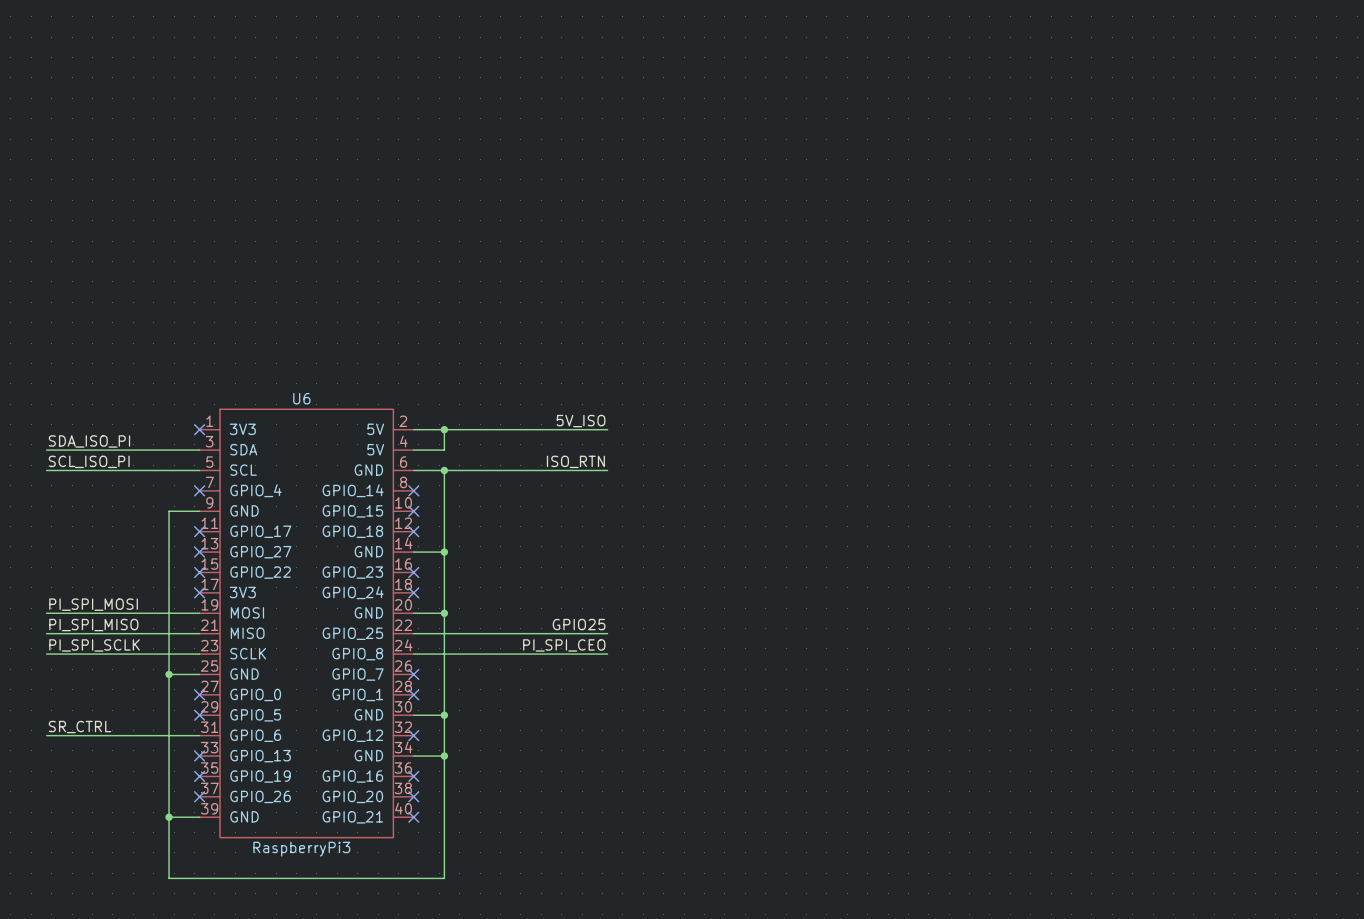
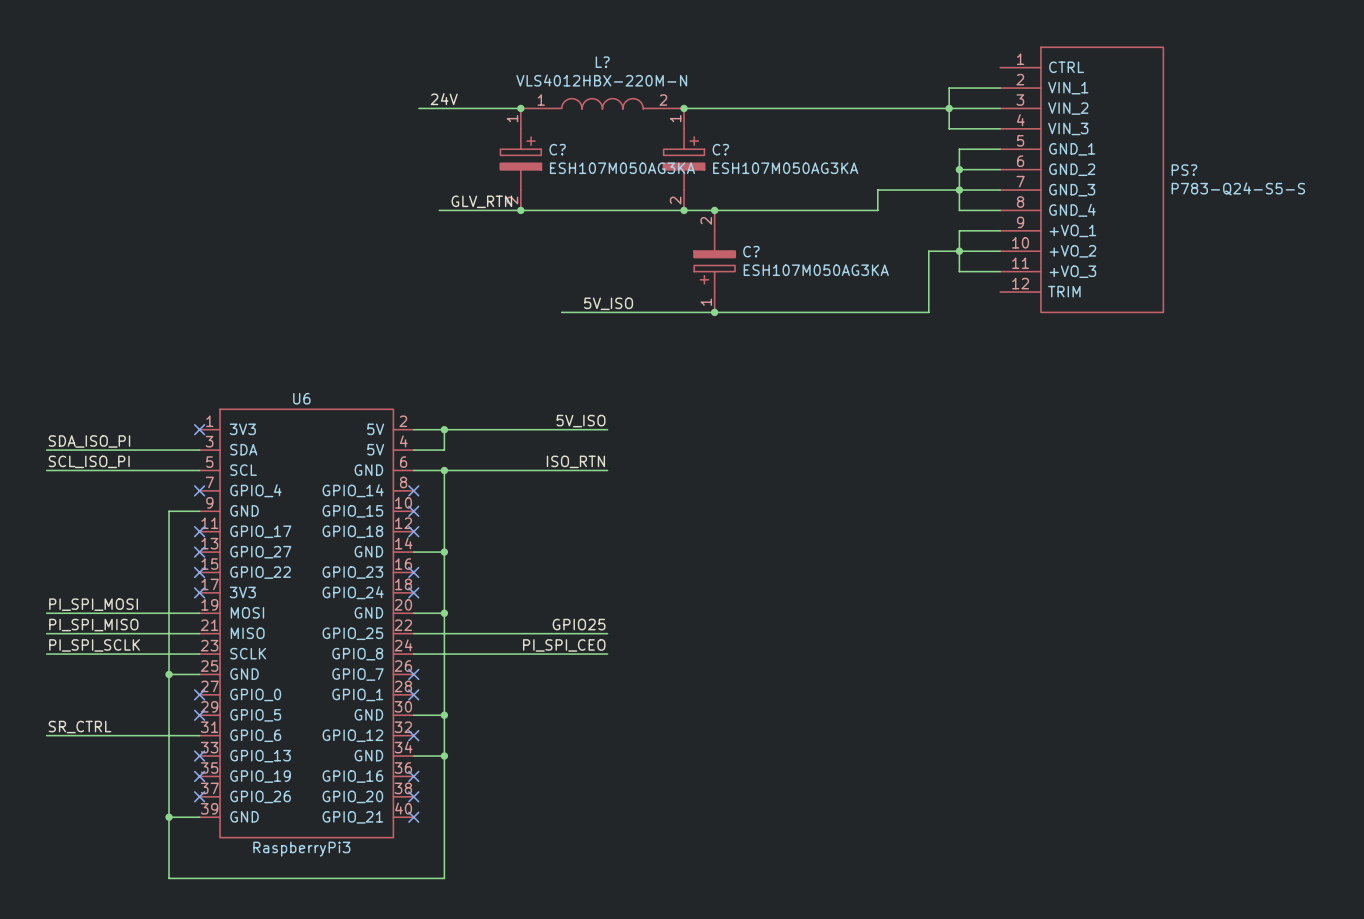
wire: none -> (1000, 88) (949, 88) (949, 128) (1000, 128)
label: none -> 24V (444, 99)
L?: none -> VLS4012HBX-220M-N (602, 103)
wire: none -> (418, 108) (520, 108)
junction: none -> (520, 108)
wire: none -> (684, 108) (1000, 108)
junction: none -> (684, 108)
junction: none -> (949, 108)
wire: none -> (1000, 149) (959, 149) (959, 210) (1000, 210)
C?: none -> ESH107M050AG3KA (520, 159)
C?: none -> ESH107M050AG3KA (684, 159)
wire: none -> (959, 169) (1000, 169)
junction: none -> (959, 169)
PS?: none -> P783-Q24-S5-S (1082, 179)
junction: none -> (959, 190)
wire: none -> (1000, 190) (877, 190) (877, 210) (439, 210)
label: none -> GLV_RTN (481, 201)
junction: none -> (520, 210)
junction: none -> (684, 210)
junction: none -> (714, 210)
wire: none -> (1000, 230) (959, 230) (959, 271) (1000, 271)
junction: none -> (959, 251)
wire: none -> (1000, 251) (928, 251) (928, 312) (561, 312)
C?: none -> ESH107M050AG3KA (714, 261)
label: none -> 5V_ISO (608, 303)
junction: none -> (714, 312)

